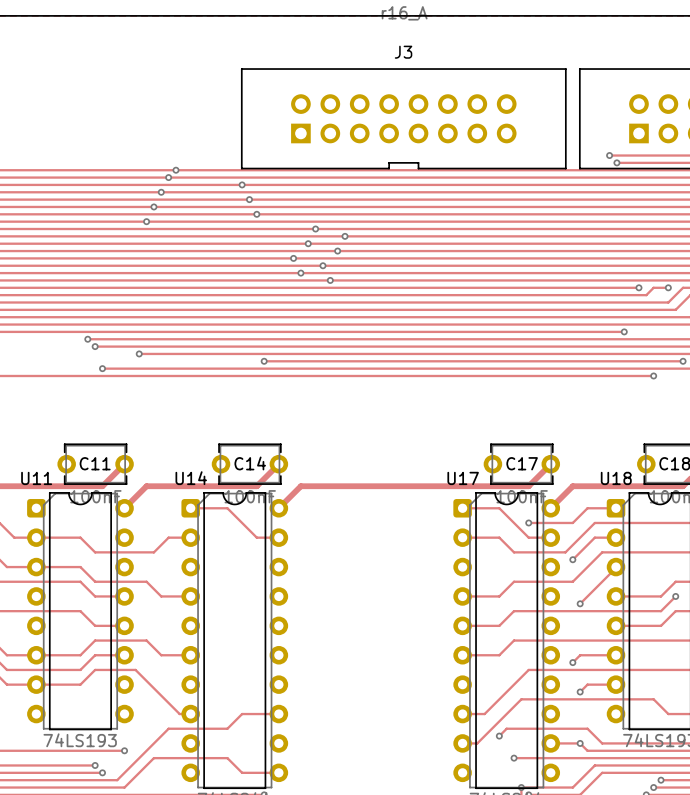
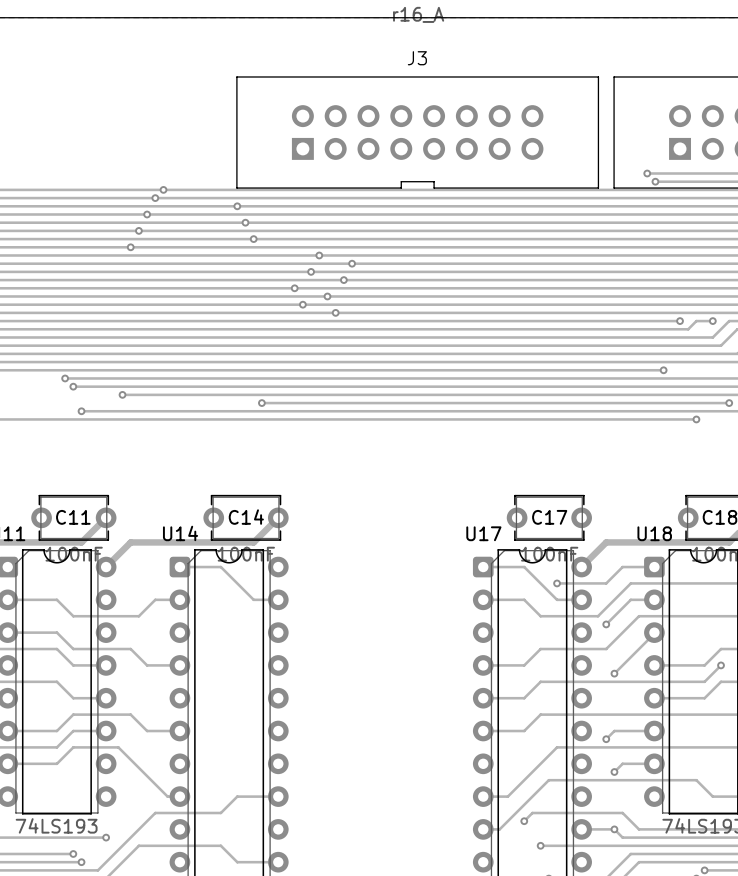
track: (550, 464) (528, 486) (300, 486) (278, 508) -> none

